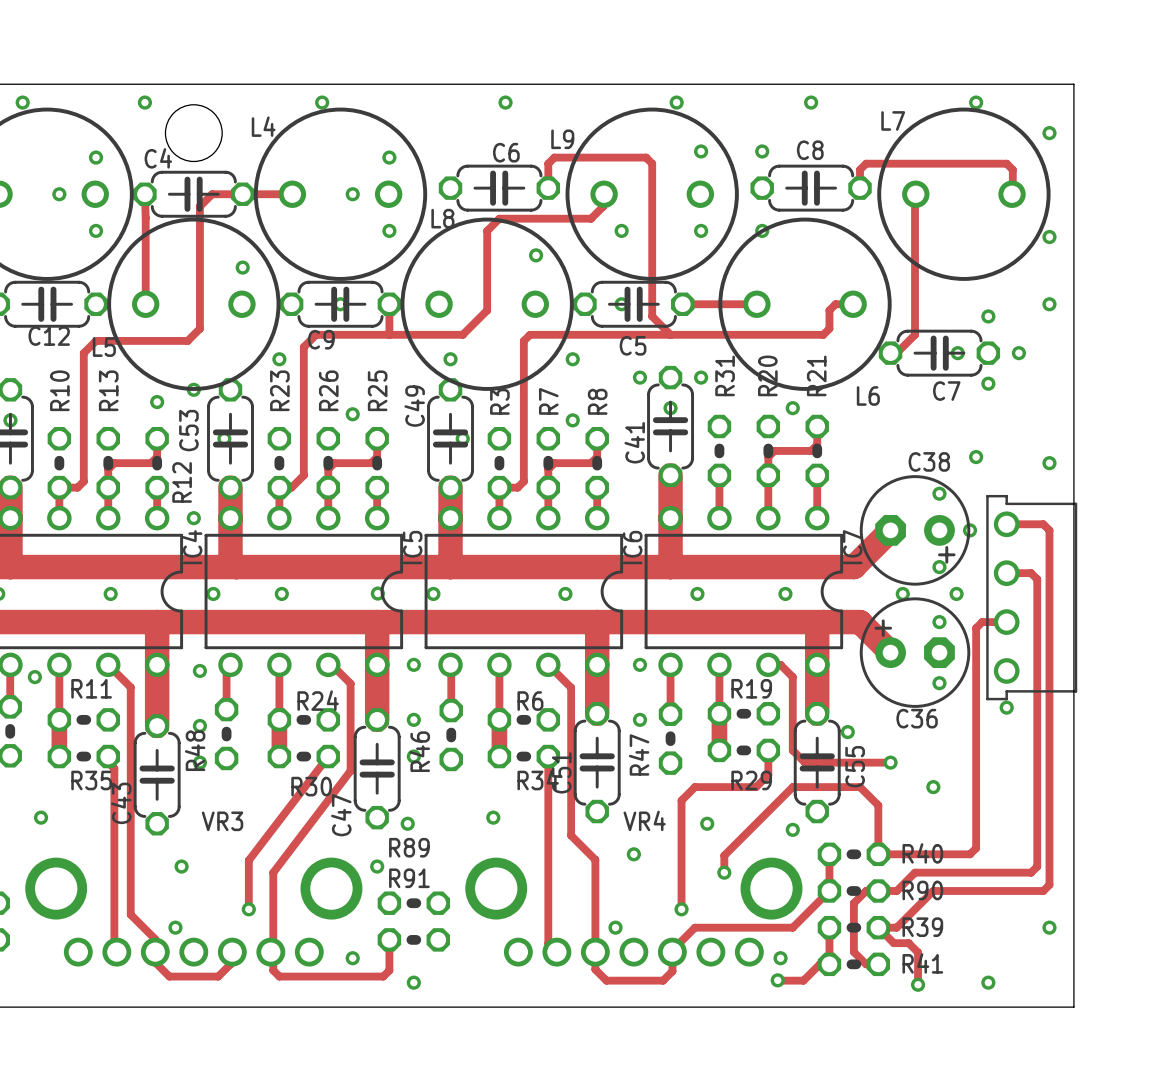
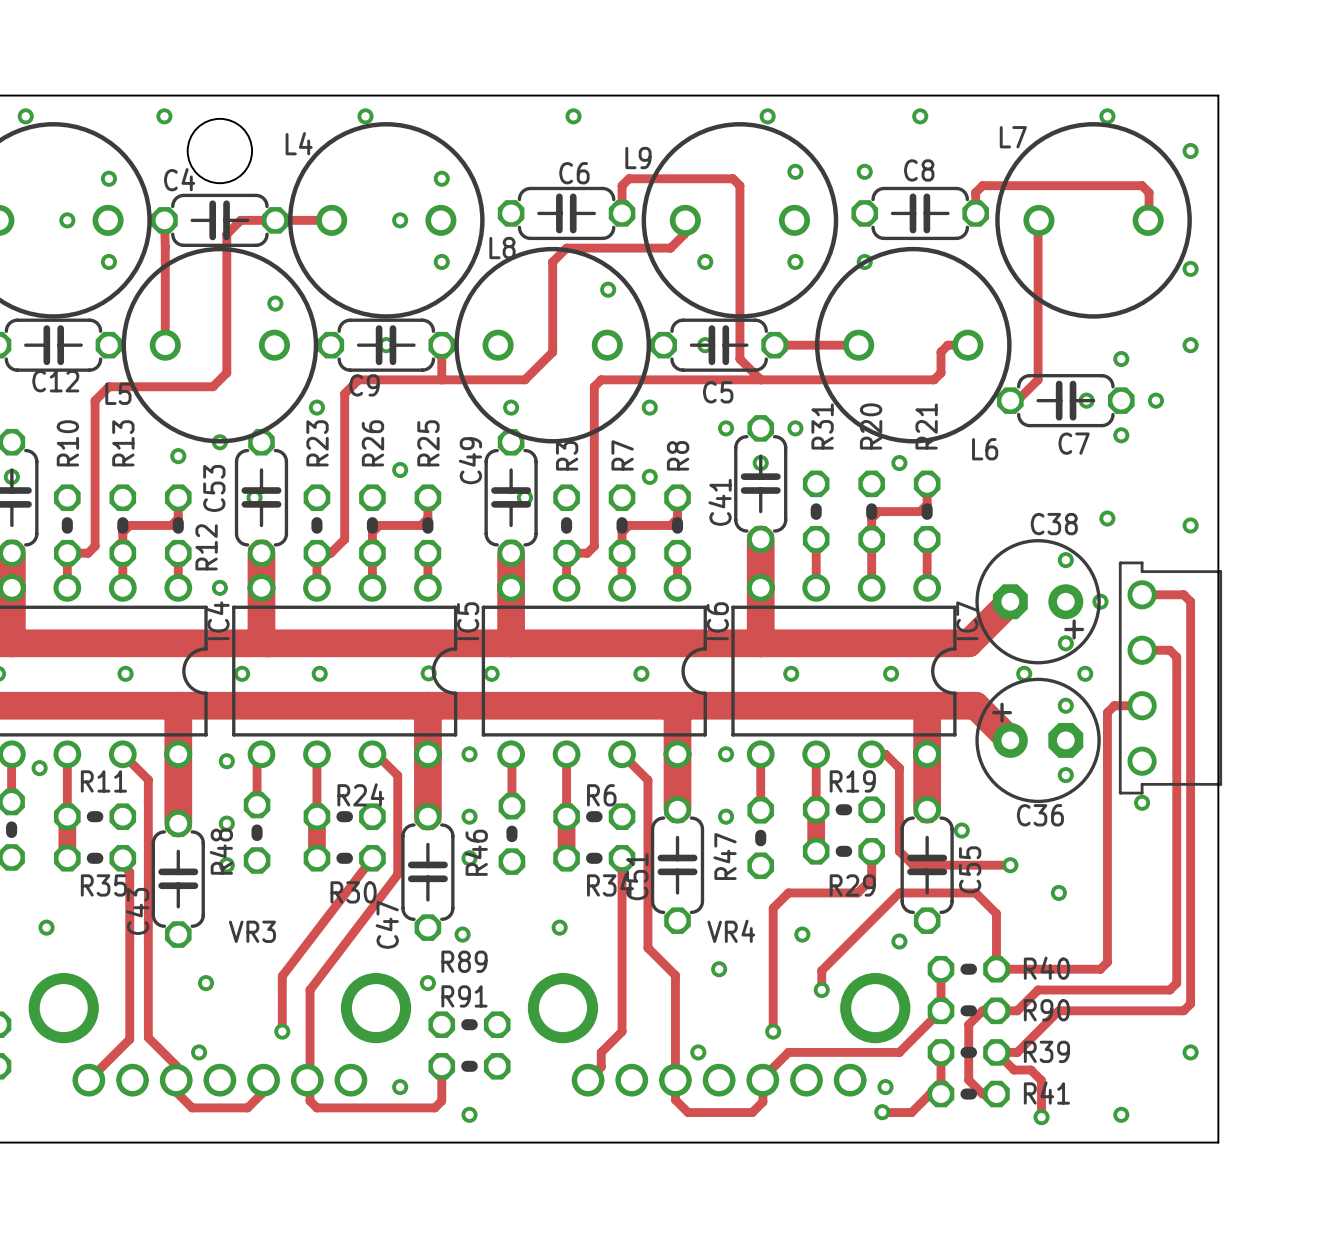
track: (548, 909) (548, 943) (556, 952) -> (622, 1031) (601, 1052) (601, 1067) (588, 1080)
track: (114, 916) (114, 949) (116, 952) -> (129, 1039) (88, 1080)

